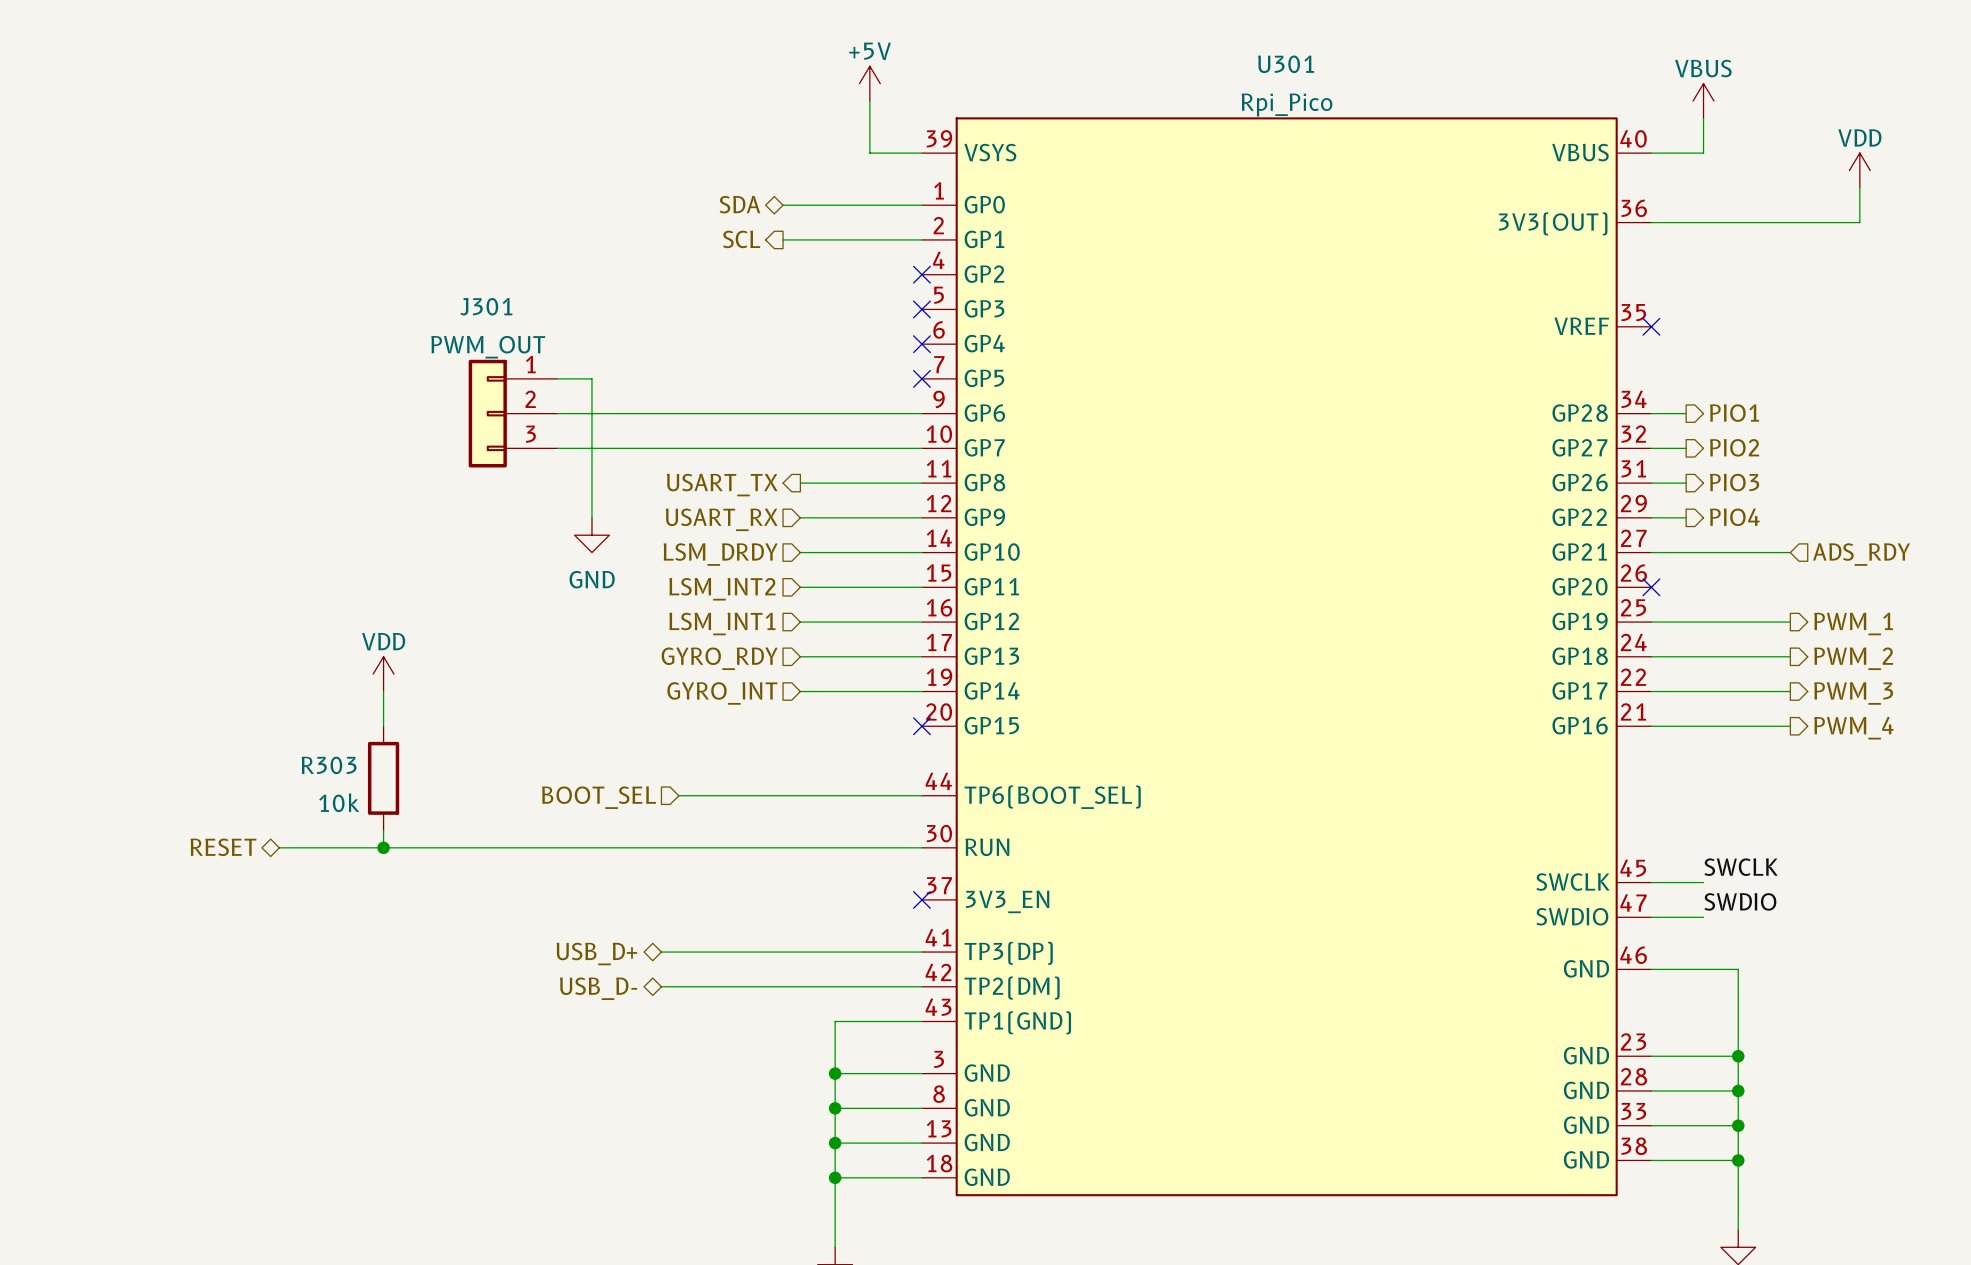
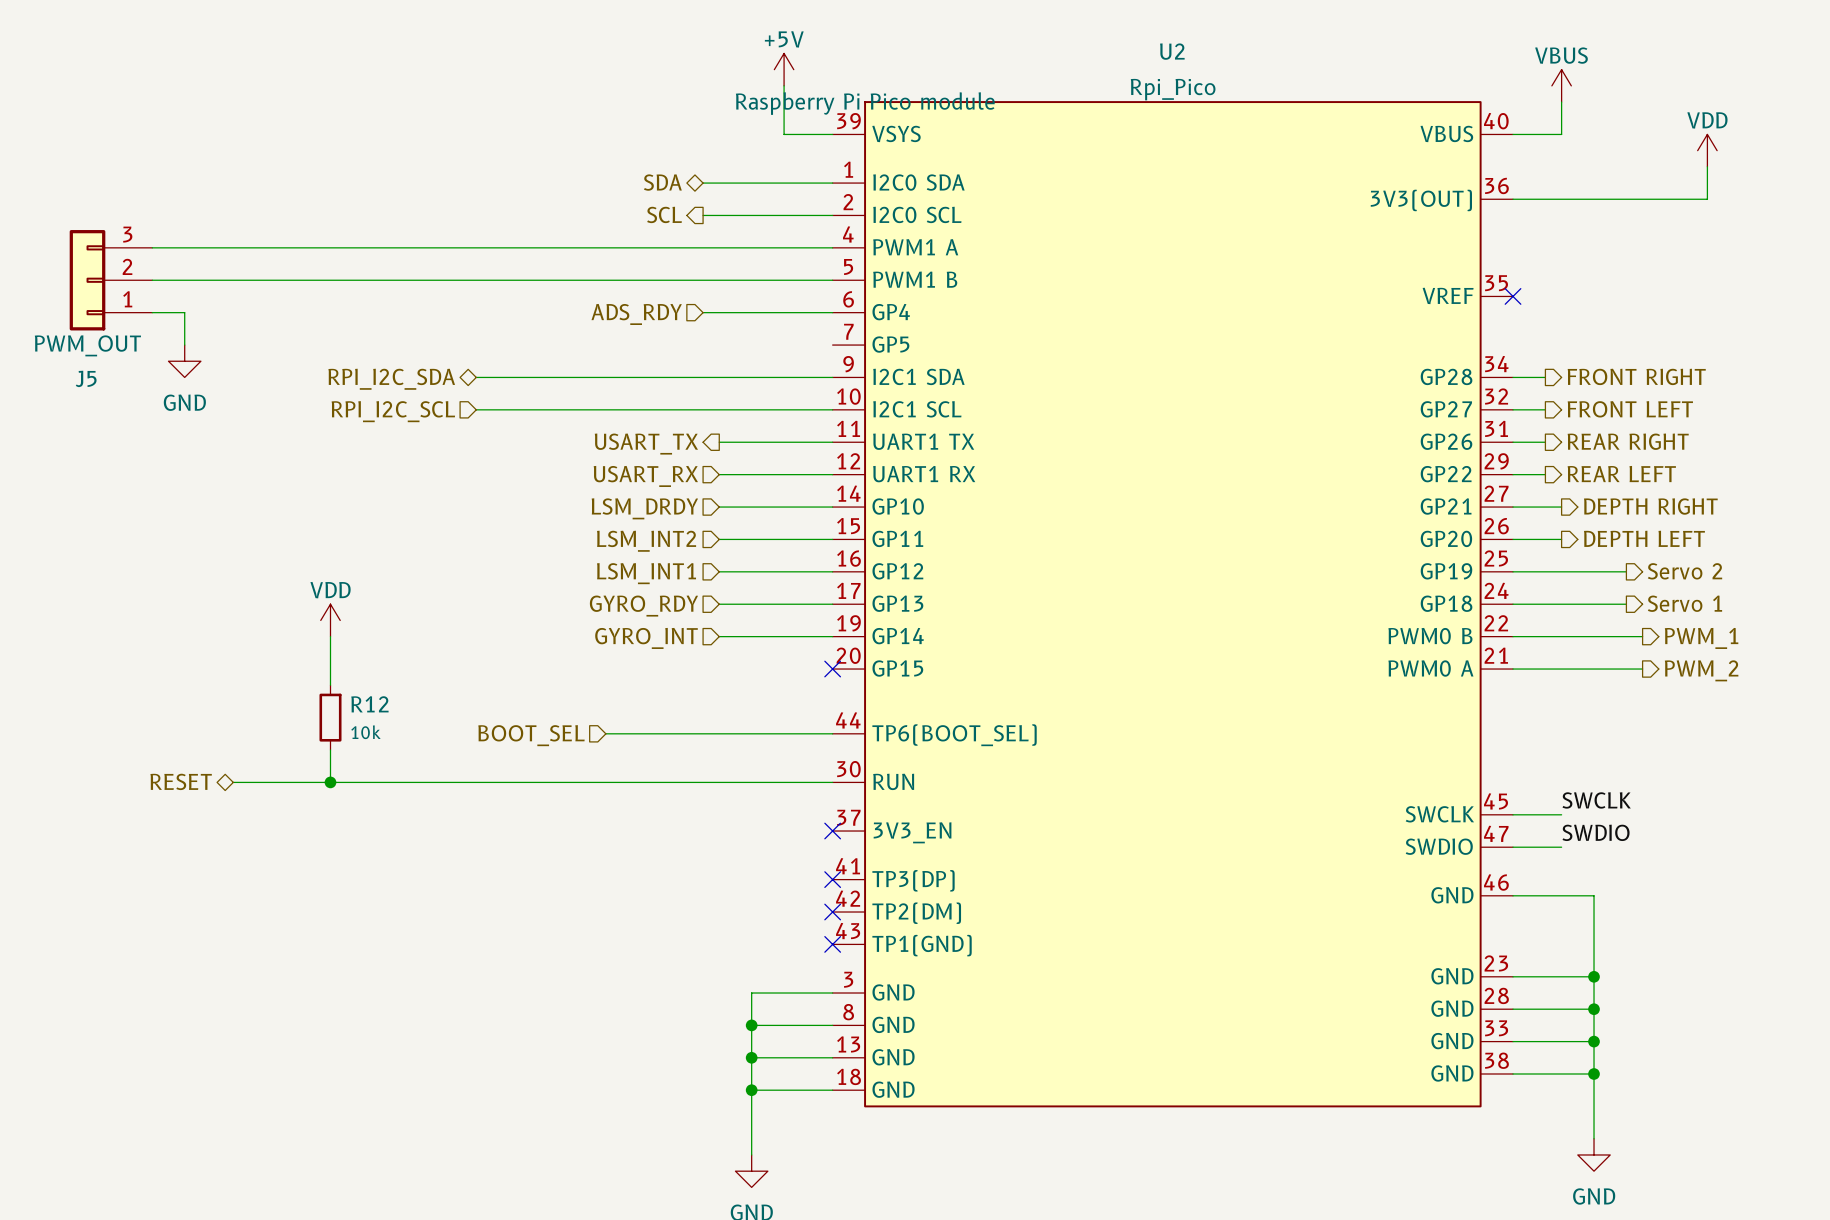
U301 name: U301 (1286, 64) -> U2 (1172, 51)
U301 symbol: [921, 117, 1652, 1197] -> [832, 101, 1514, 1108]
U301 text: none -> Raspberry Pi Pico module (865, 103)
wire: none -> (152, 247) (832, 247)
no-connect mark: (921, 274) -> none
J5: none -> PWM_OUT (111, 280)
wire: none -> (152, 280) (832, 280)
no-connect mark: (921, 309) -> none
wire: none -> (152, 312) (184, 312) (184, 345)
wire: none -> (703, 312) (832, 312)
no-connect mark: (921, 344) -> none
hierarchical label: none -> ADS_RDY (636, 314)
wire: (557, 378) (591, 378) (591, 517) -> none
no-connect mark: (921, 378) -> none
power symbol: none -> GND (184, 361)
J301: PWM_OUT (512, 413) -> none
hierarchical label: PIO1 (1734, 413) -> FRONT RIGHT (1636, 376)
hierarchical label: none -> RPI_I2C_SDA (391, 379)
hierarchical label: PIO2 (1734, 447) -> FRONT LEFT (1630, 409)
hierarchical label: none -> RPI_I2C_SCL (393, 411)
hierarchical label: PIO3 (1734, 482) -> REAR RIGHT (1628, 441)
hierarchical label: PIO4 (1734, 517) -> REAR LEFT (1621, 474)
power symbol: GND (591, 535) -> none
wire: (1703, 552) (1790, 552) -> none
hierarchical label: none -> DEPTH RIGHT (1650, 506)
hierarchical label: ADS_RDY (1861, 554) -> none
hierarchical label: none -> DEPTH LEFT (1644, 538)
wire: none -> (1513, 539) (1561, 539)
no-connect mark: (1651, 587) -> none
hierarchical label: none -> Servo 2 (1685, 571)
wire: (1772, 622) (1790, 622) -> none
hierarchical label: PWM_1 (1853, 624) -> none
wire: (1772, 656) (1790, 656) -> none
hierarchical label: none -> Servo 1 (1684, 603)
hierarchical label: PWM_2 (1853, 658) -> none
hierarchical label: PWM_3 (1853, 693) -> PWM_1 (1701, 638)
hierarchical label: PWM_4 (1853, 728) -> PWM_2 (1701, 670)
R303: 10k (383, 778) -> none
R12: none -> 10k (330, 717)
wire: (661, 952) (921, 952) -> none
no-connect mark: none -> (832, 879)
hierarchical label: USB_D+ (596, 953) -> none
wire: (661, 986) (921, 986) -> none
no-connect mark: none -> (832, 912)
hierarchical label: USB_D- (598, 988) -> none
wire: (921, 1021) (835, 1021) (835, 1073) -> none
no-connect mark: none -> (832, 944)
junction: (835, 1073) -> none

